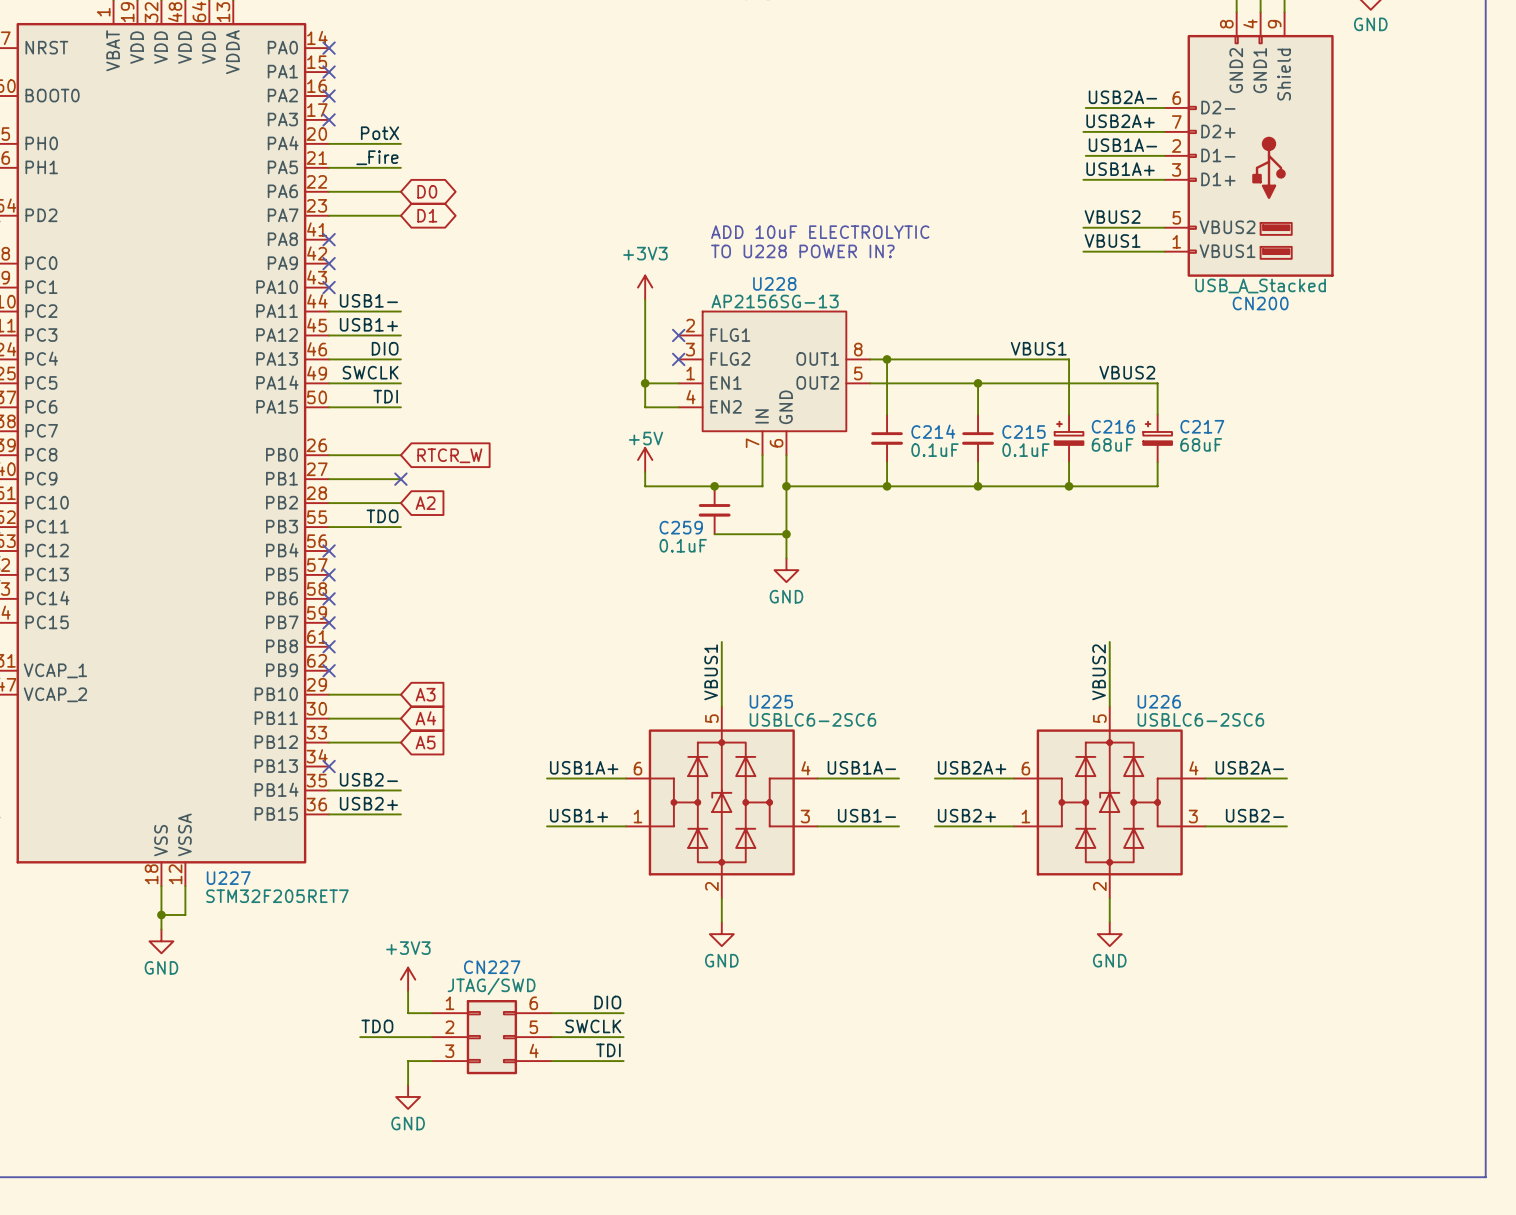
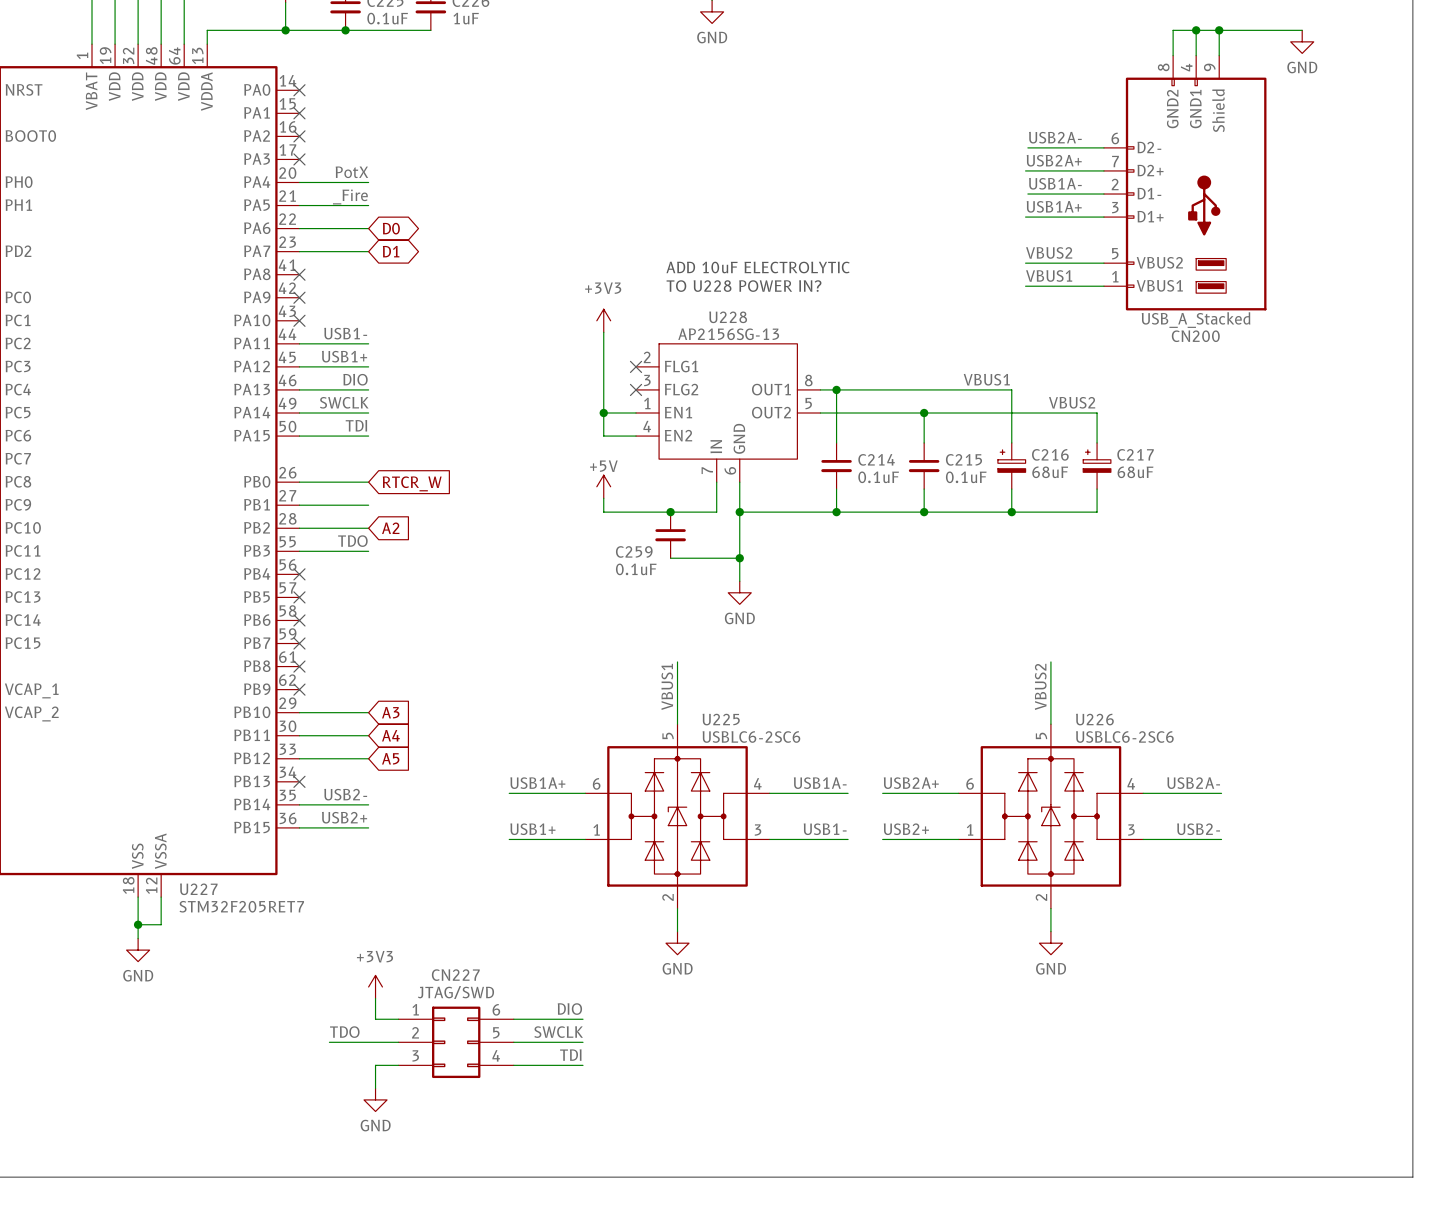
no-connect mark: (400, 479) -> none

